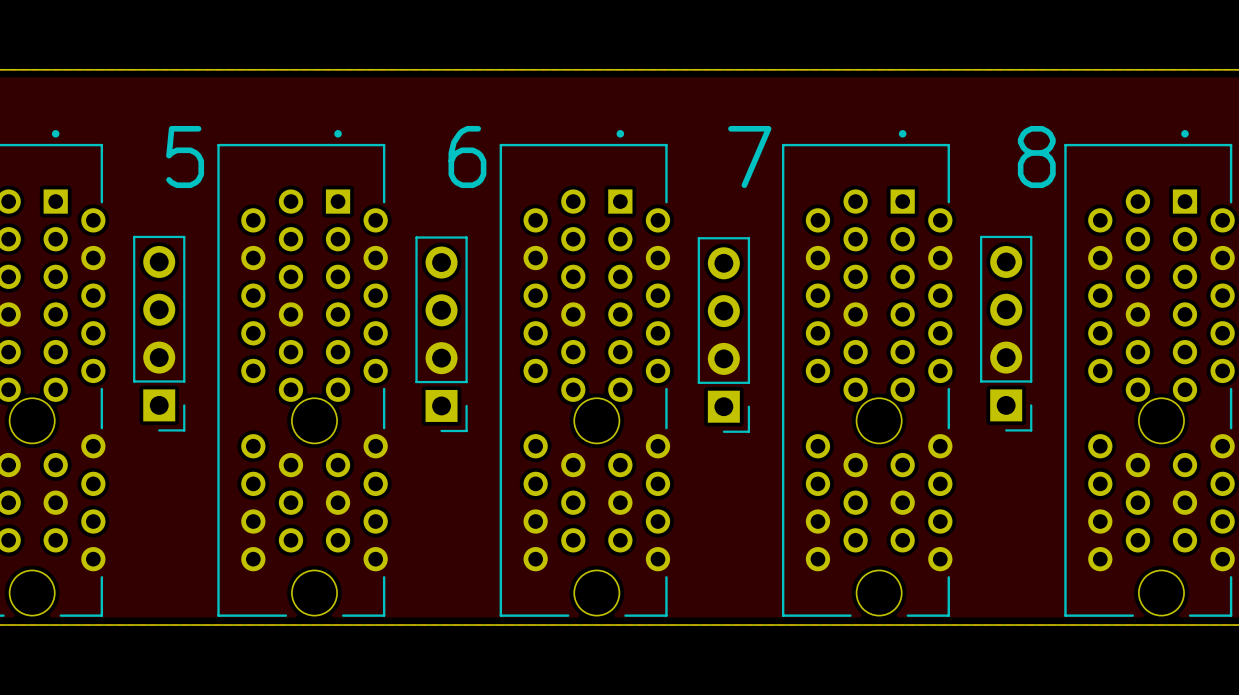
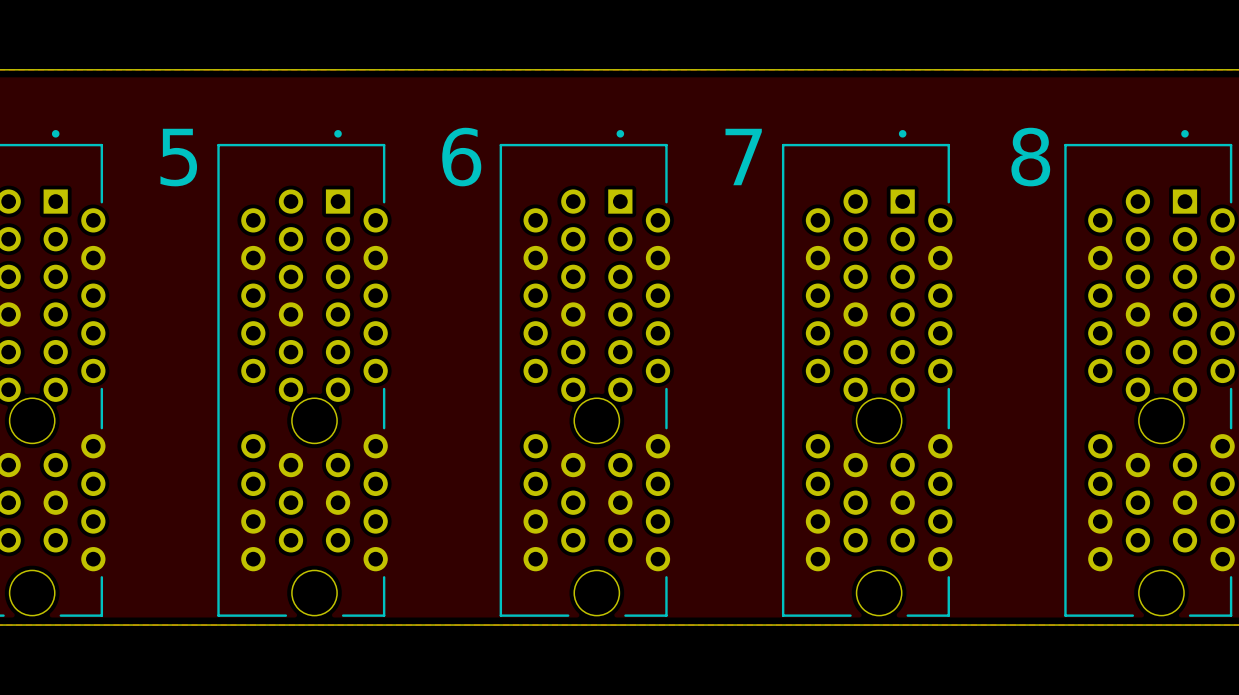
part: (159, 333) -> none
part: (1006, 333) -> none
part: (441, 334) -> none
part: (723, 335) -> none

